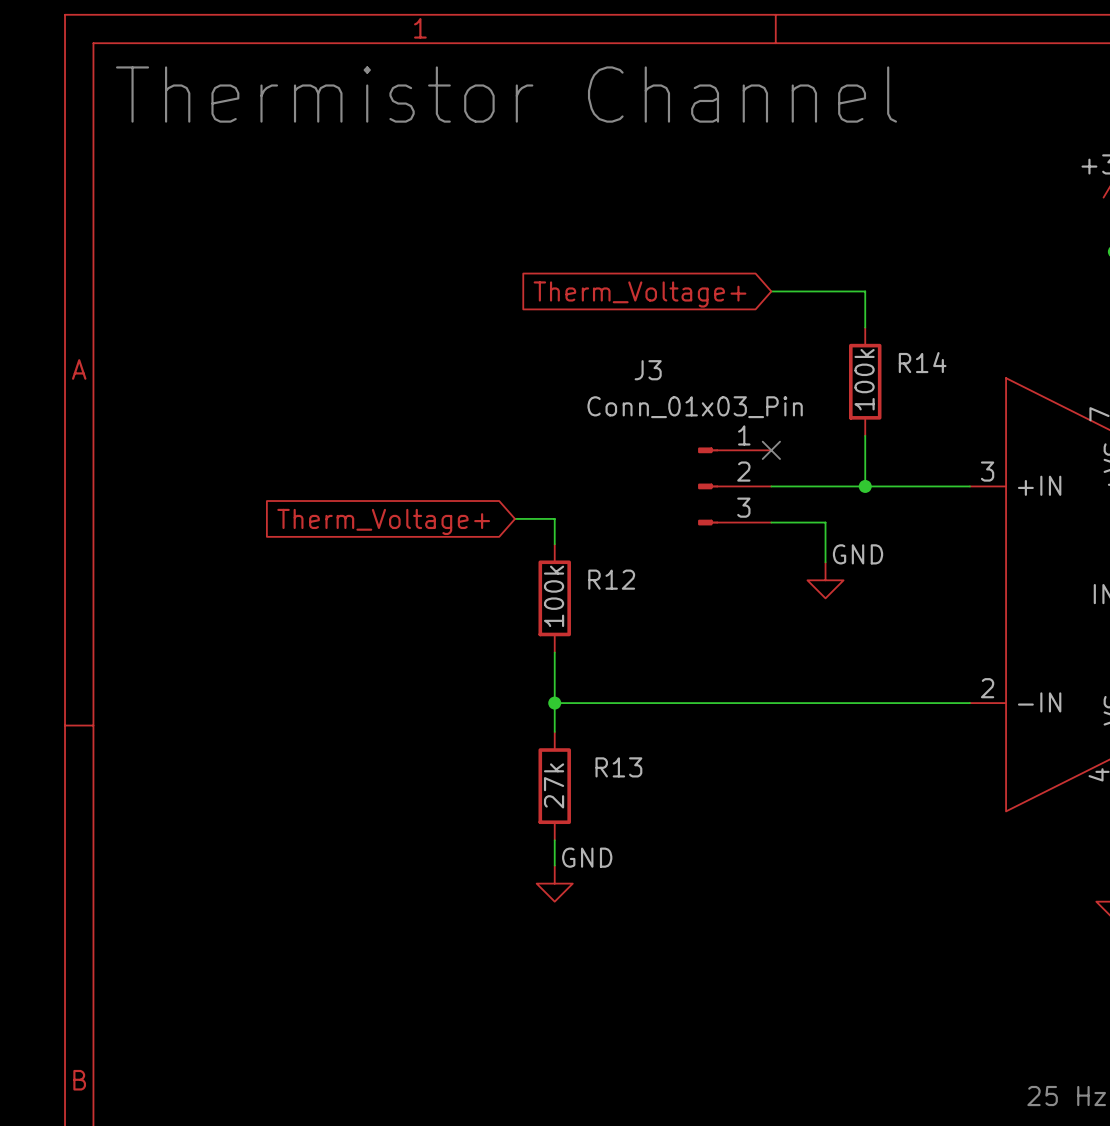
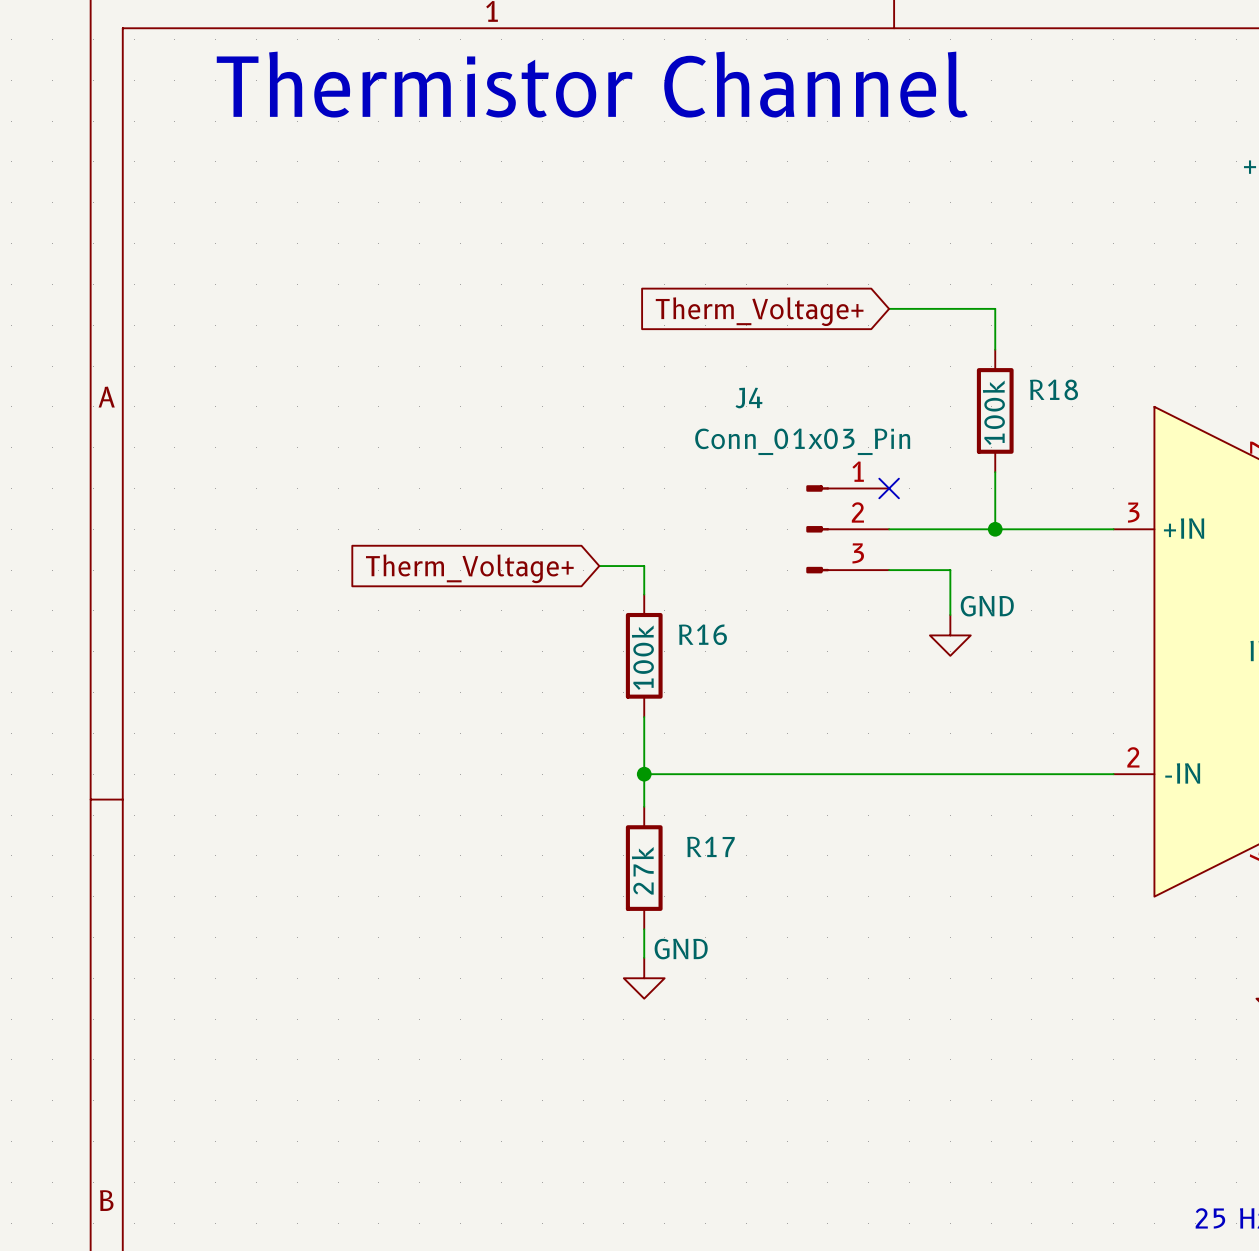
R14 name: R14 (922, 362) -> R18 (1053, 389)
J3 name: J3 (648, 370) -> J4 (749, 398)
R12 name: R12 (611, 579) -> R16 (702, 634)
R13 name: R13 (618, 767) -> R17 (710, 846)

